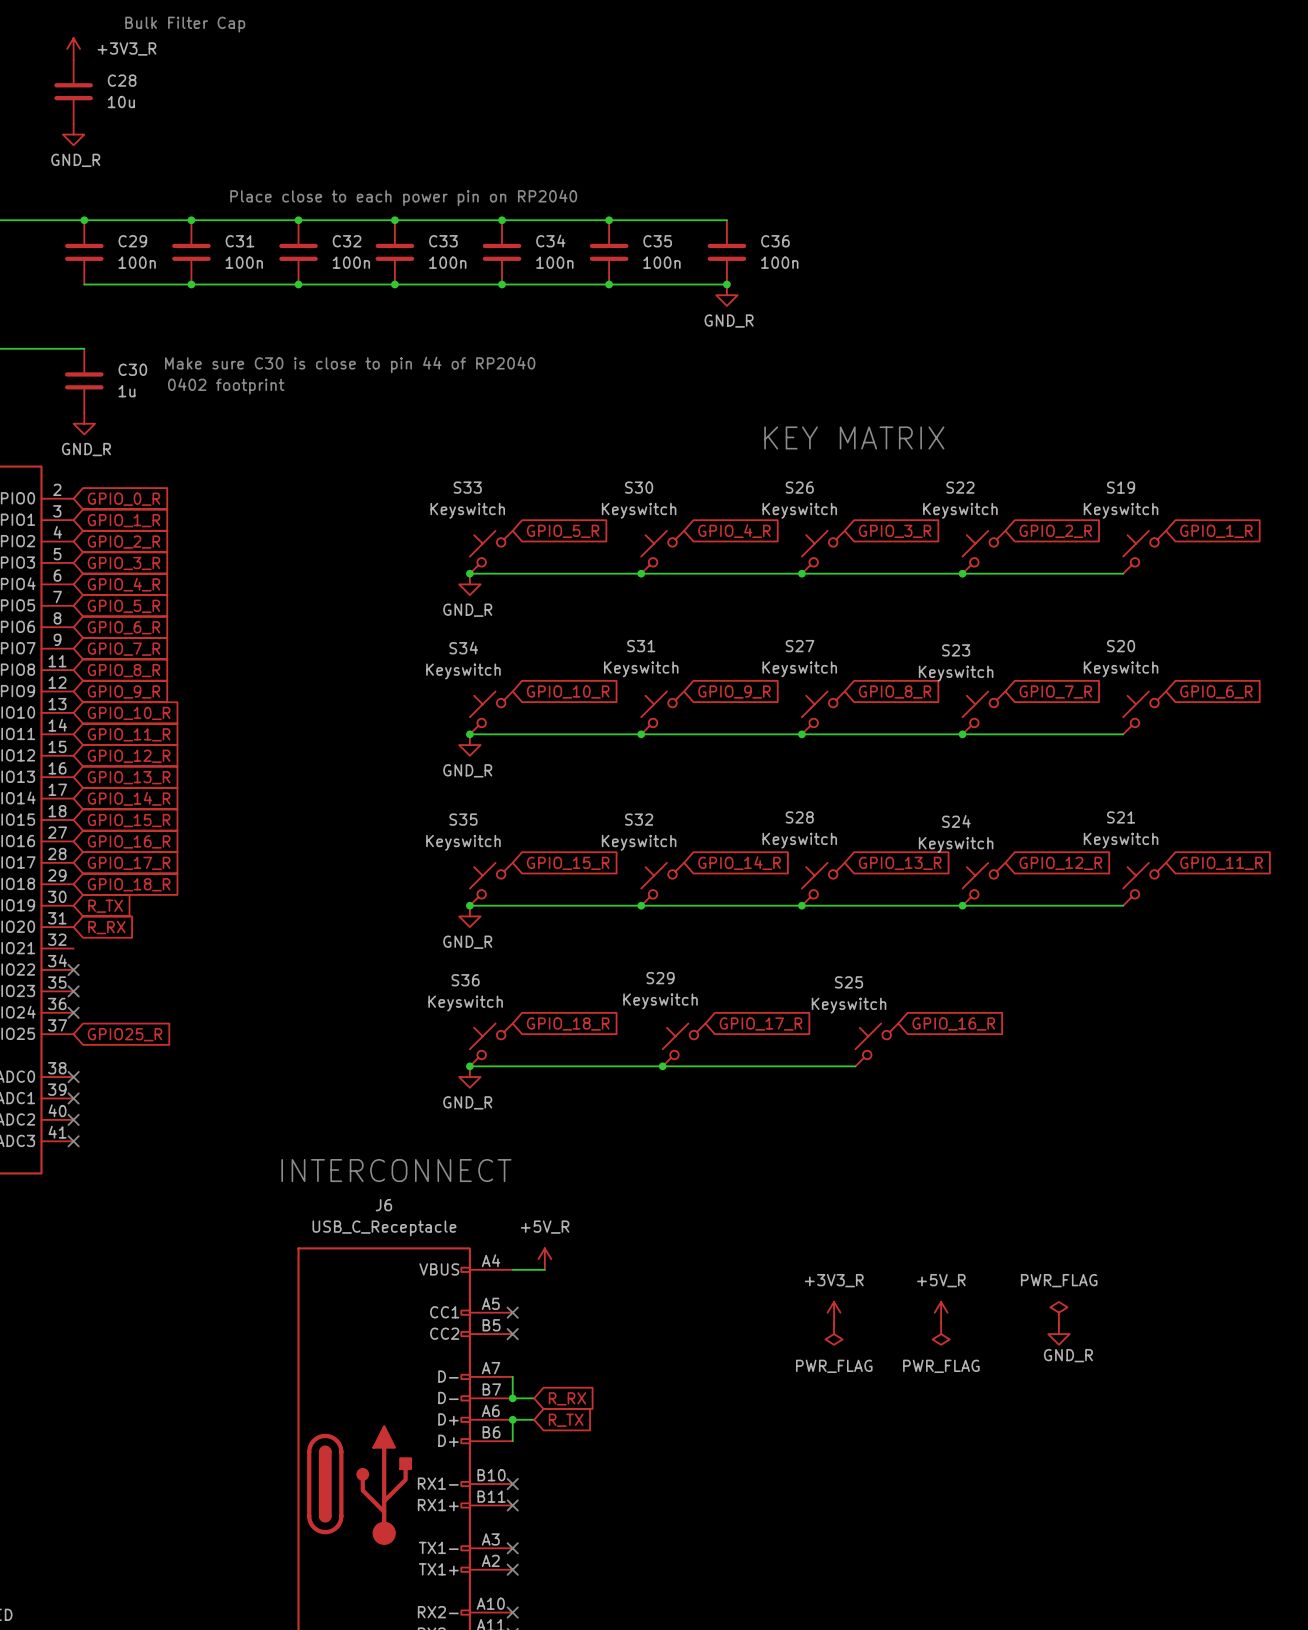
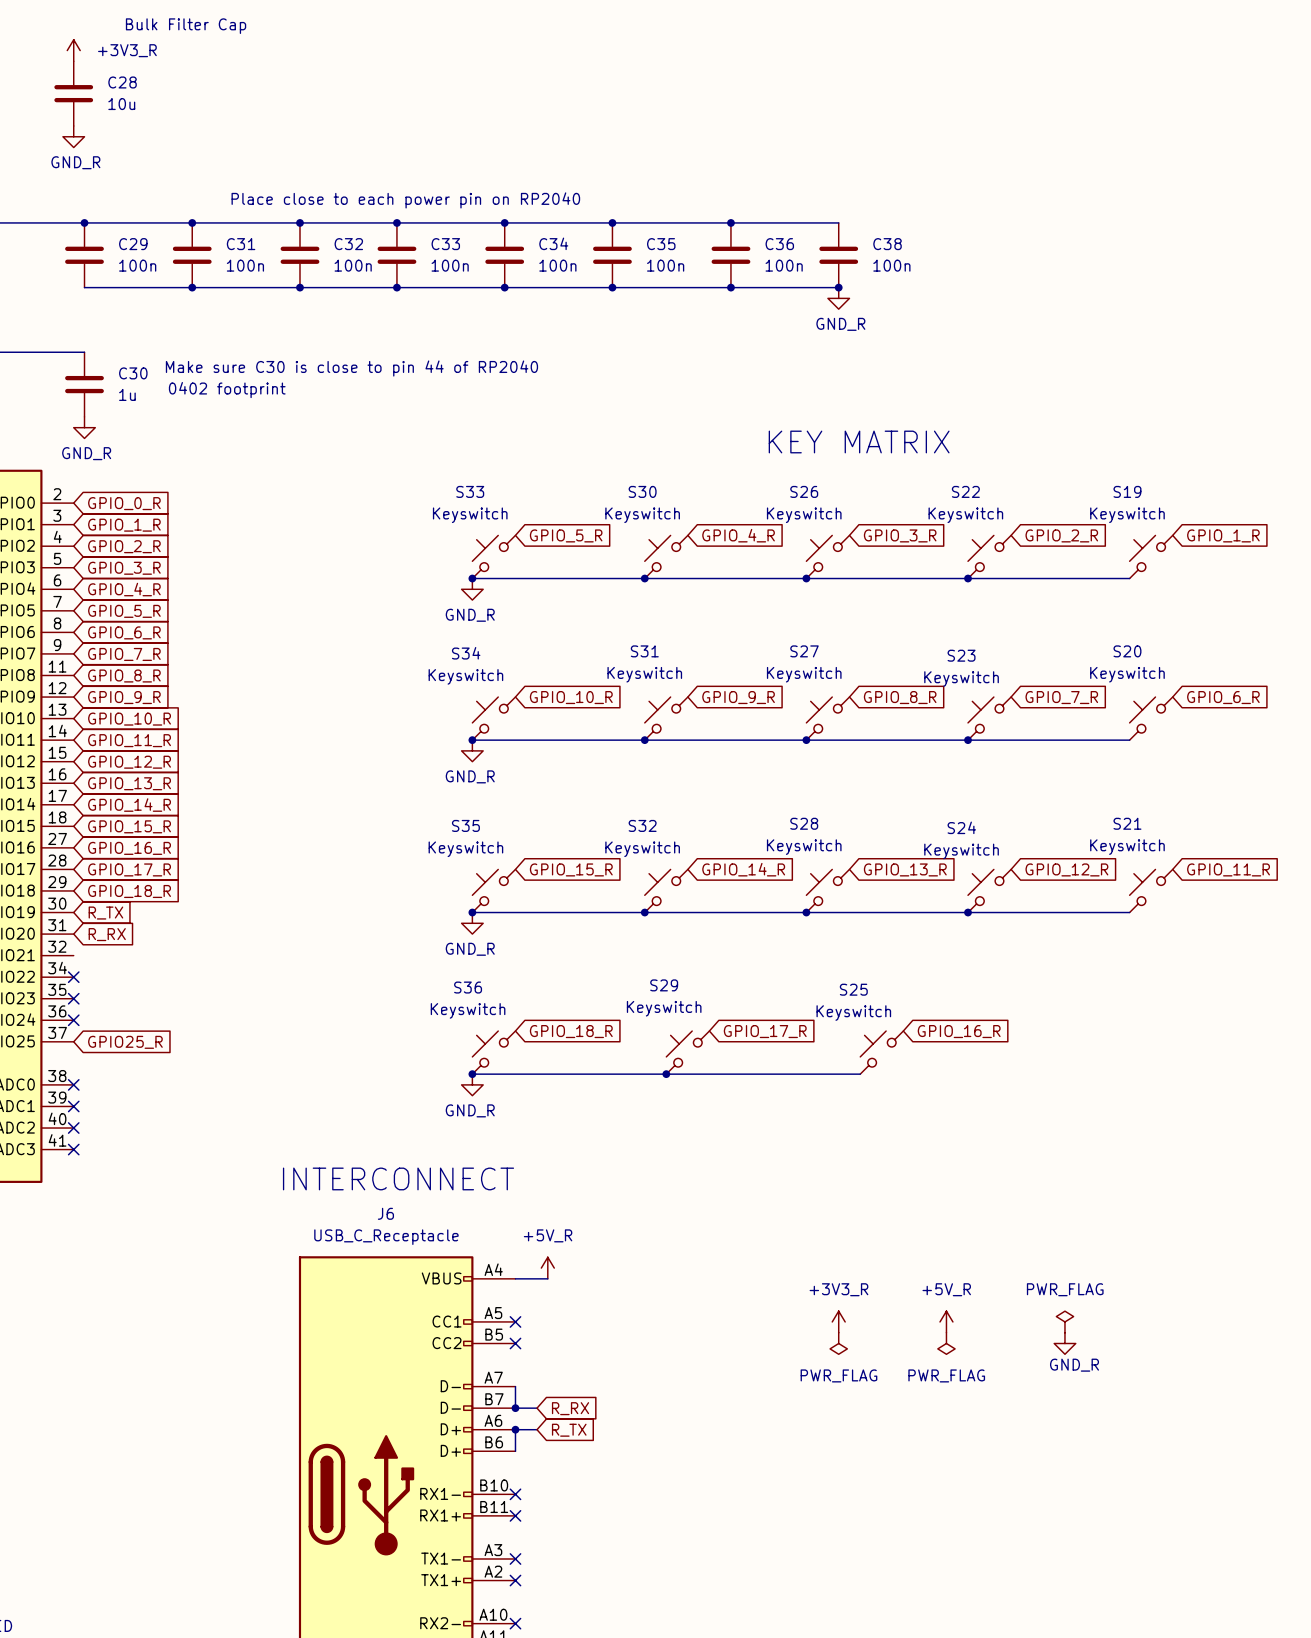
wire: none -> (730, 222) (838, 222)
junction: none -> (730, 222)
C38: none -> 100n (838, 255)
wire: none -> (730, 287) (838, 287)
junction: none -> (838, 287)
power symbol position: GND_R (726, 295) -> GND_R (838, 298)

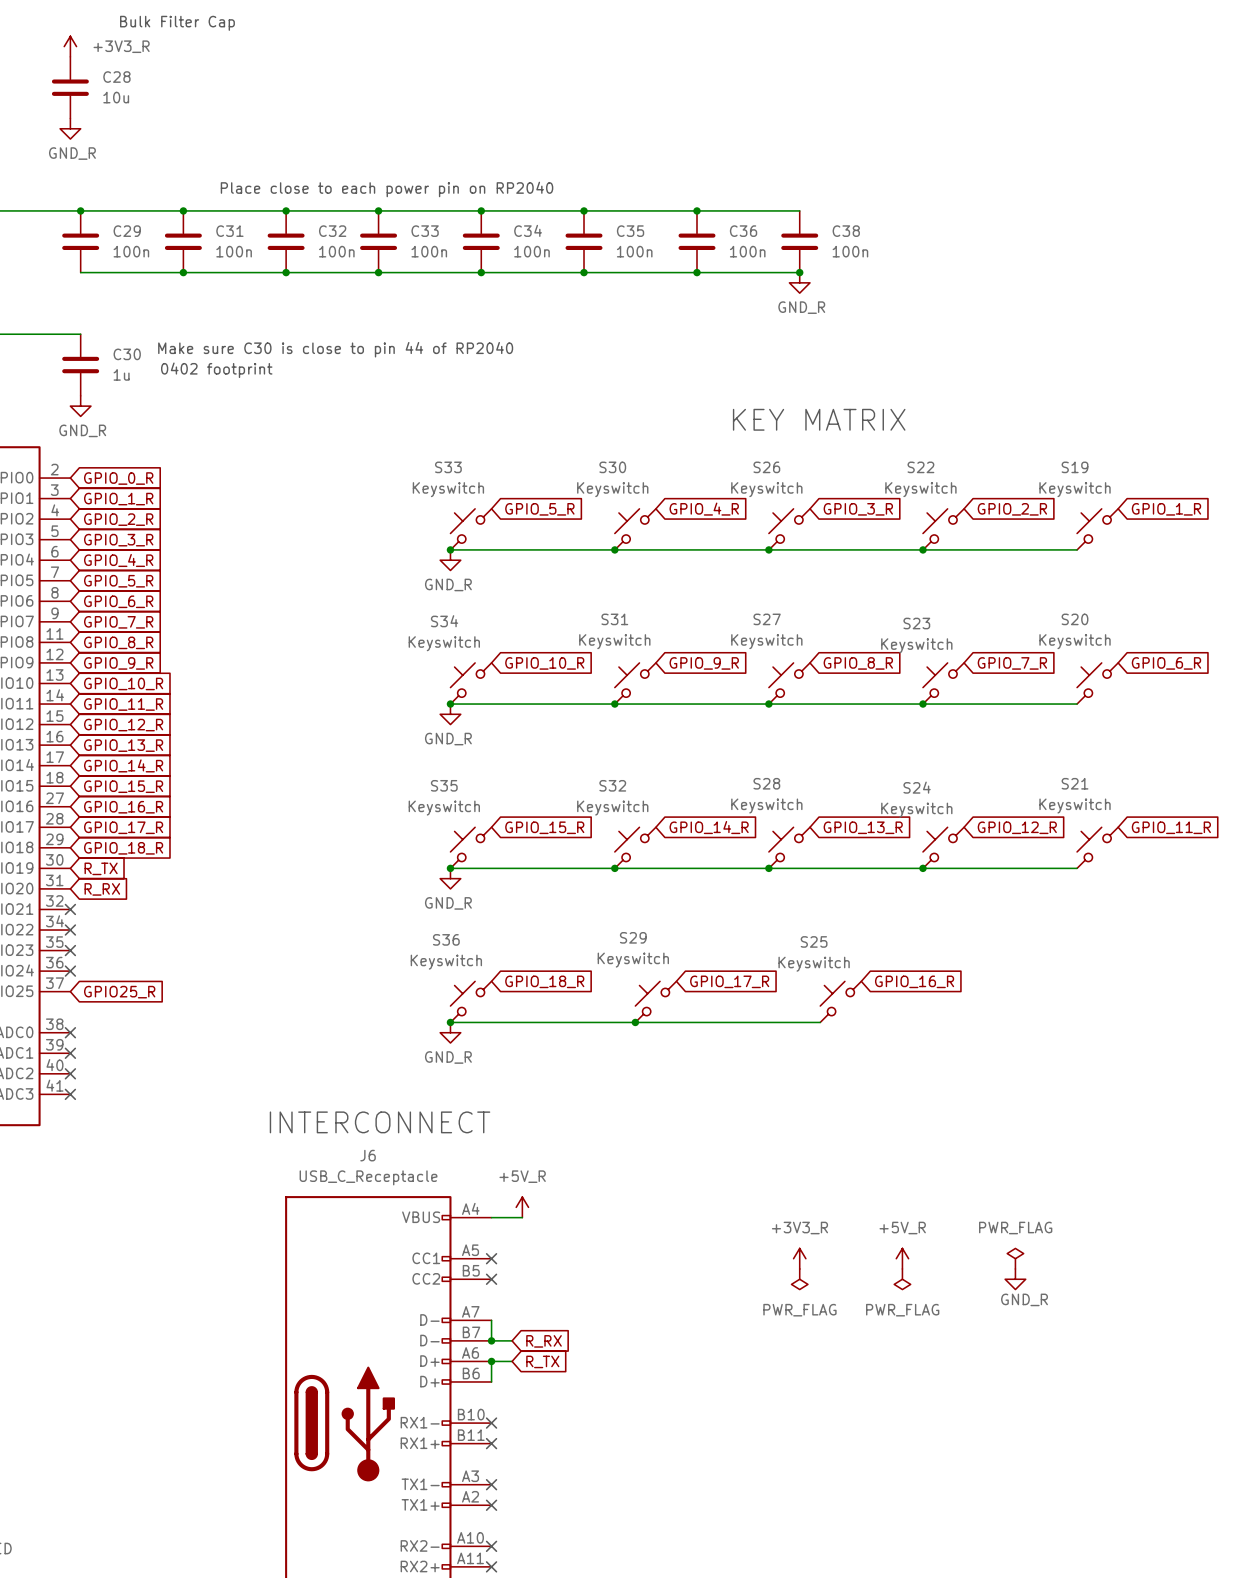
no-connect mark: none -> (70, 909)

